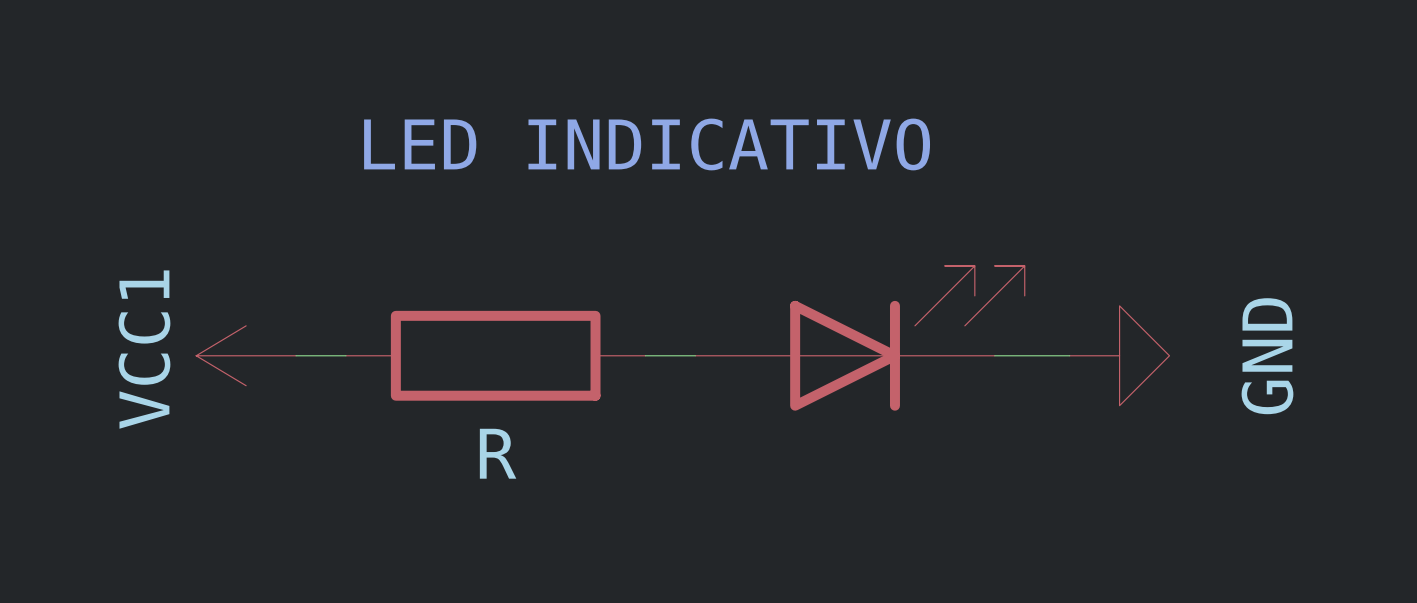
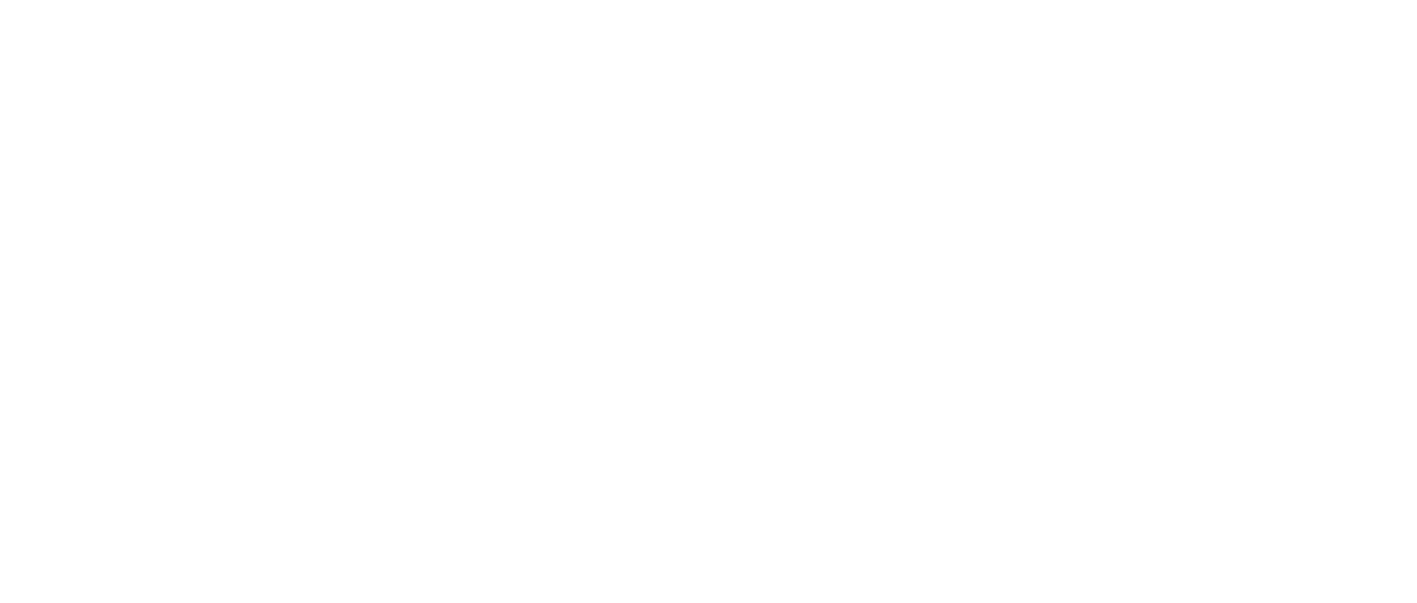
text: LED INDICATIVO (647, 144) -> none
part: (860, 338) -> none
power symbol: VCC1 (246, 355) -> none
wire: (296, 355) (345, 355) -> none
part: R (495, 355) -> none
wire: (645, 355) (695, 355) -> none
wire: (994, 355) (1069, 355) -> none
power symbol: GND (1119, 355) -> none

